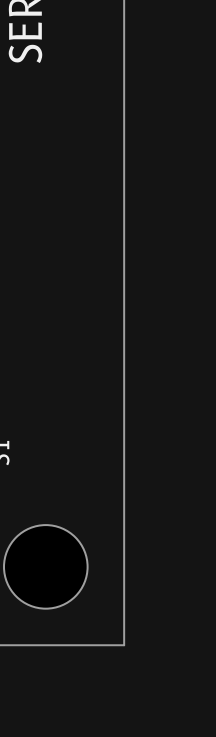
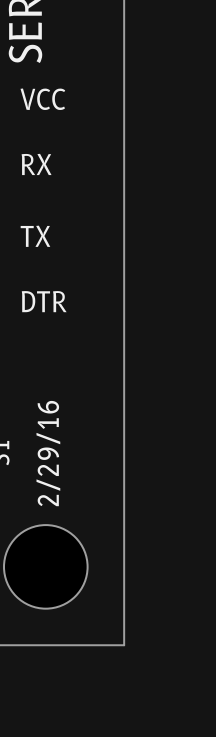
text: none -> VCC (42, 99)
text: none -> RX (36, 164)
text: none -> TX (35, 236)
text: none -> DTR (44, 301)
text: none -> 2/29/16 (48, 453)

